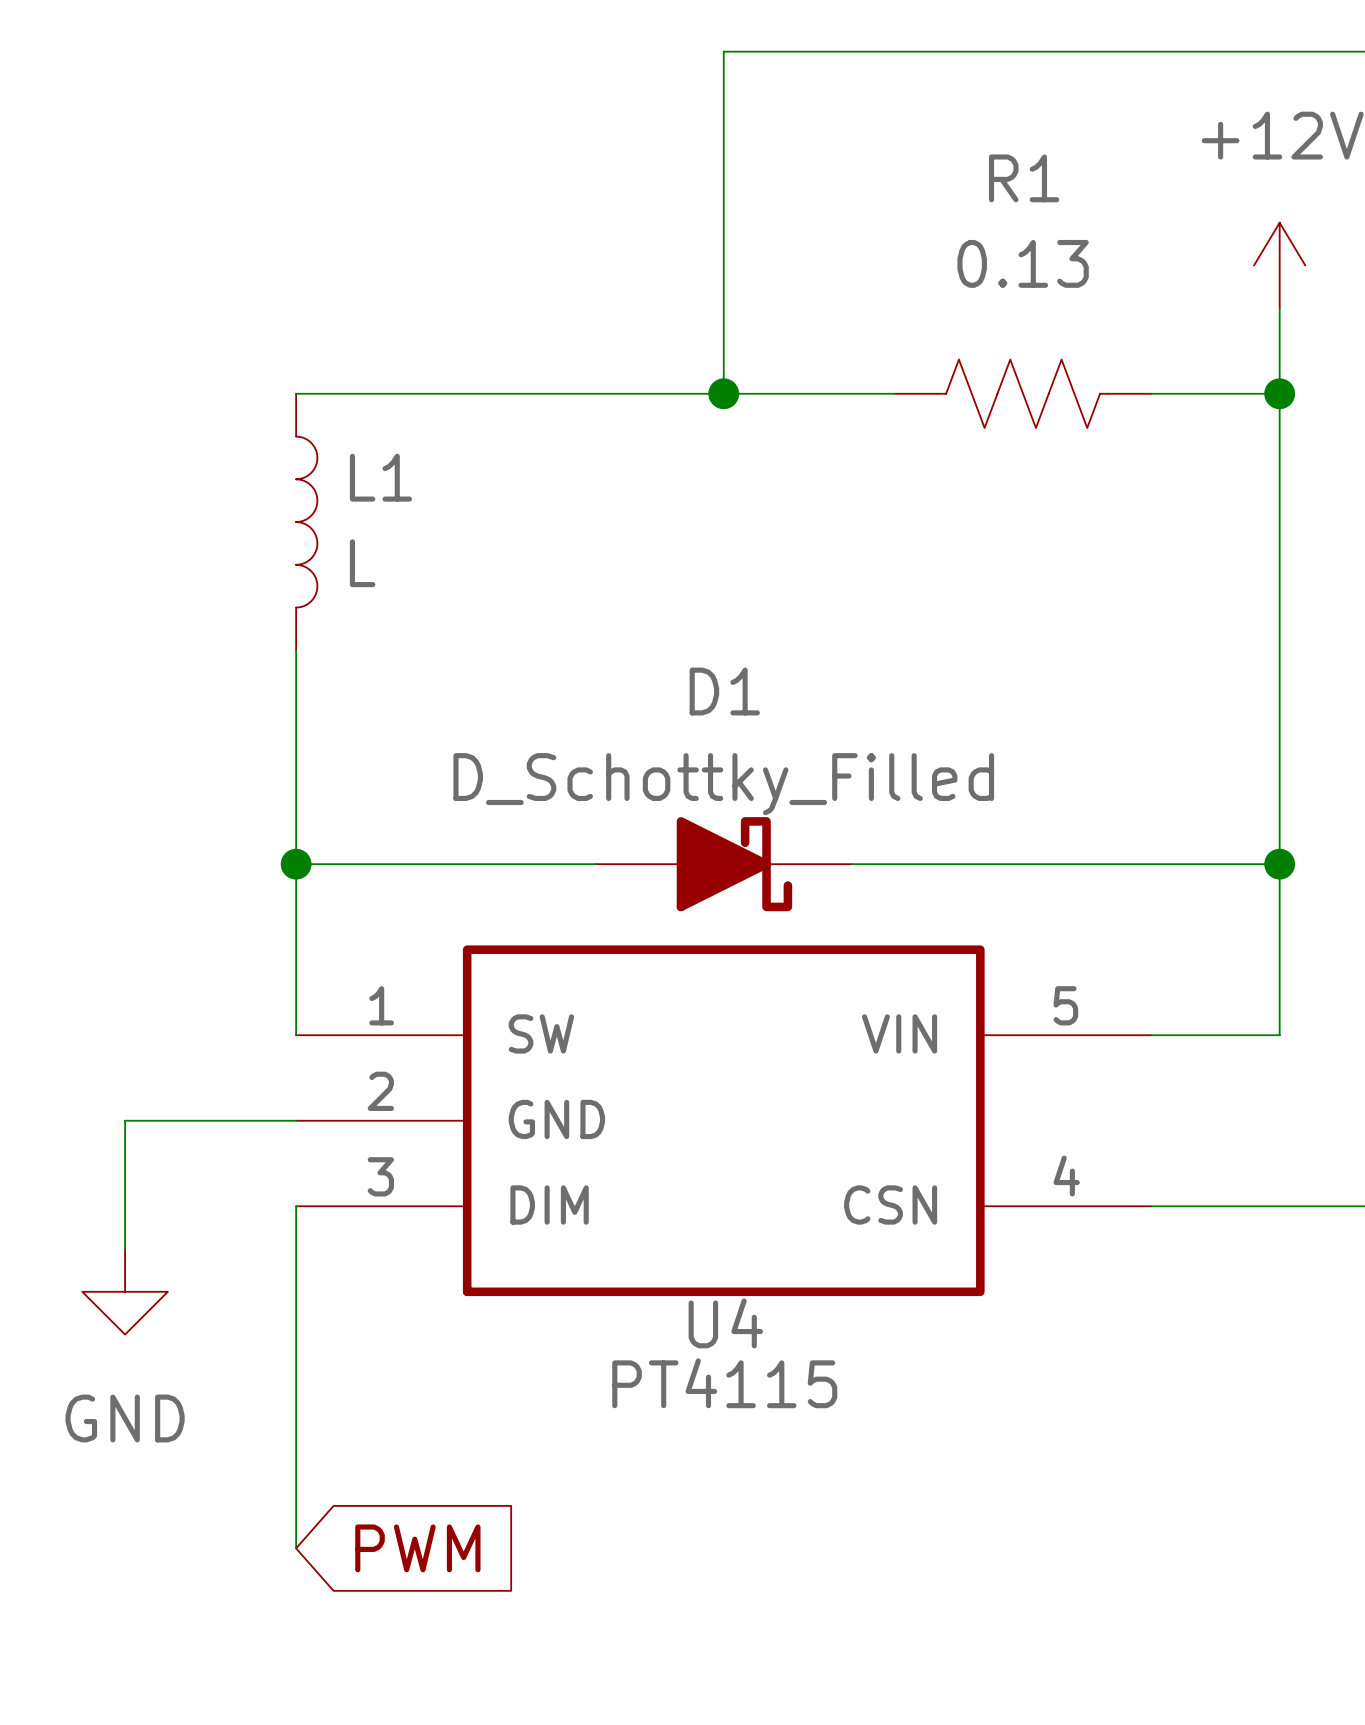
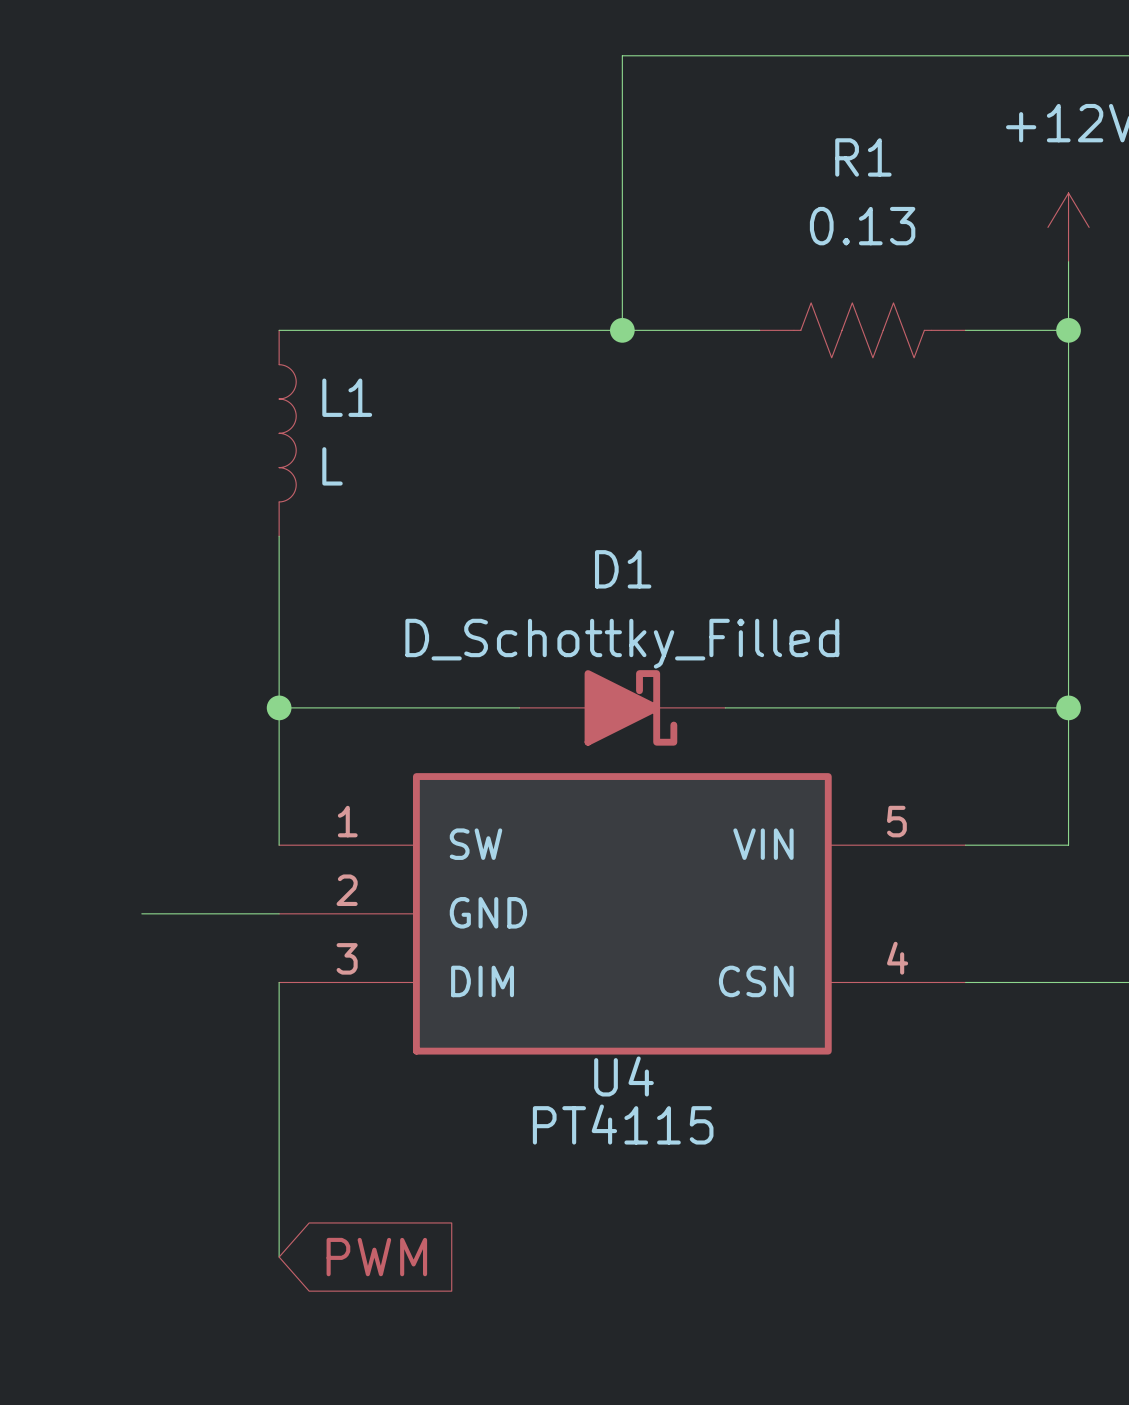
wire: (125, 1120) (125, 1249) -> none
power symbol: GND (125, 1291) -> none

